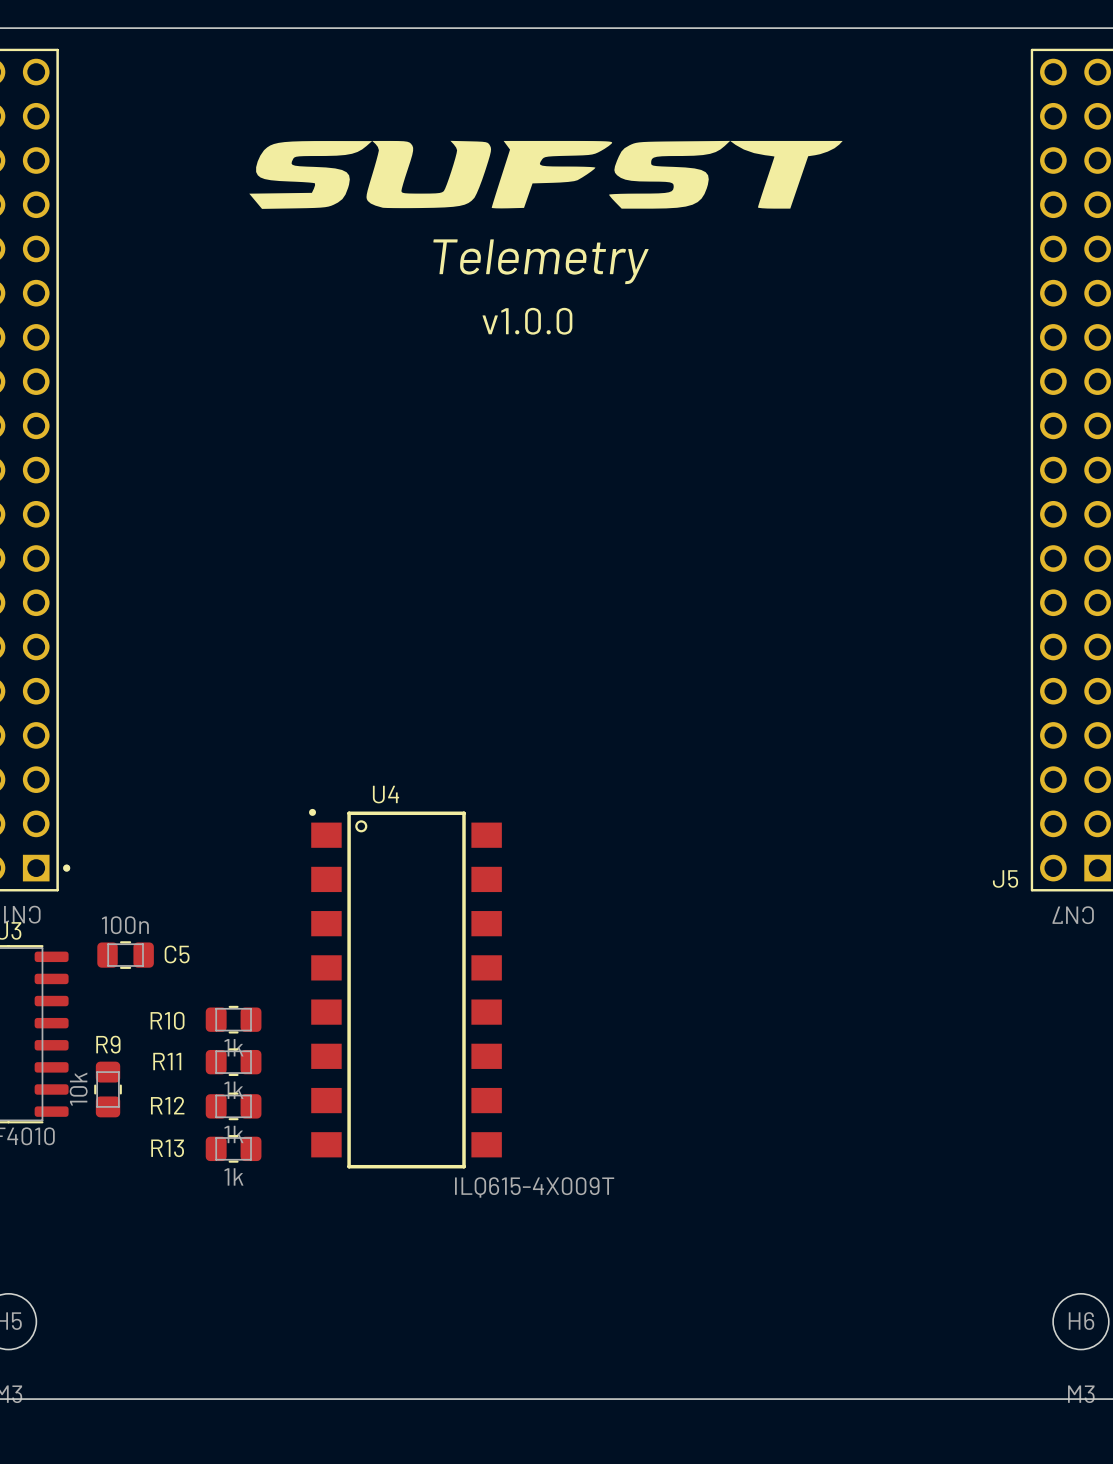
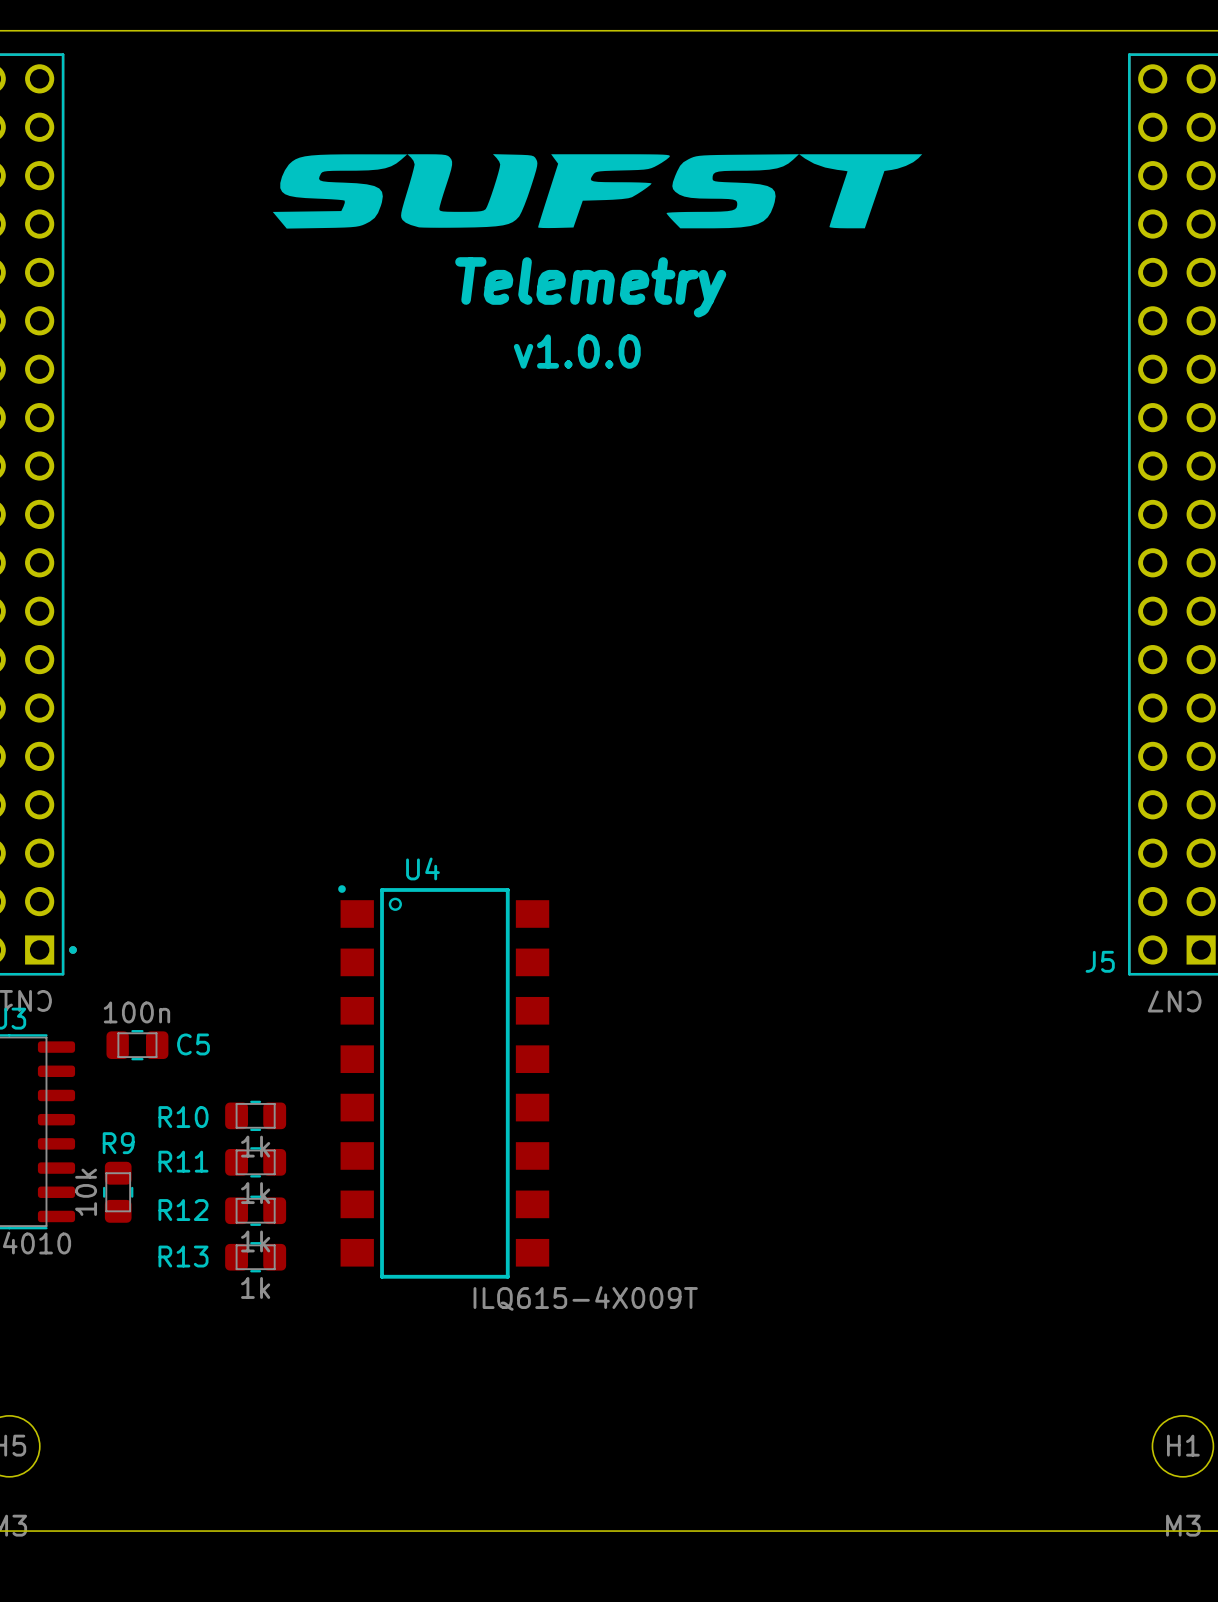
H6 name: H6 (1081, 1321) -> H1 (1183, 1445)

